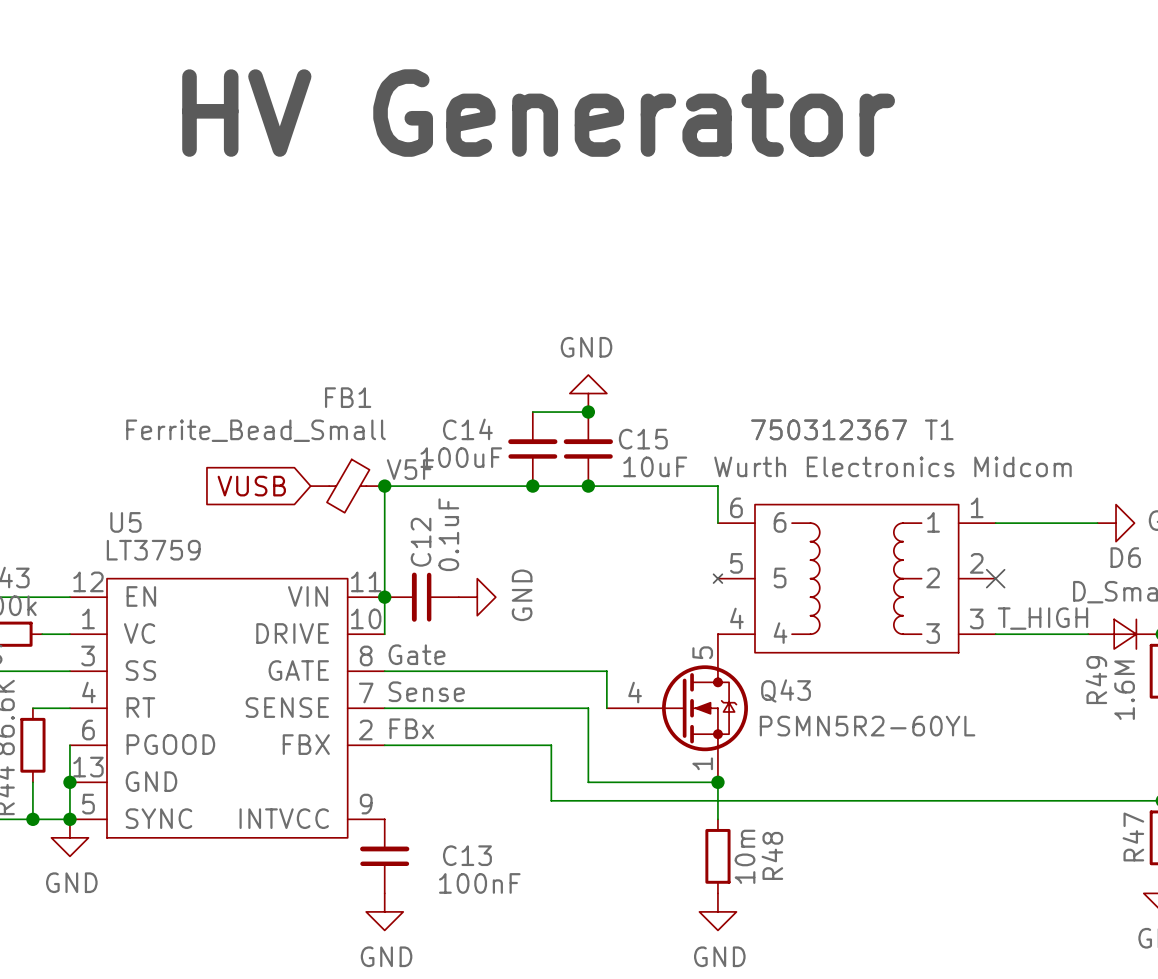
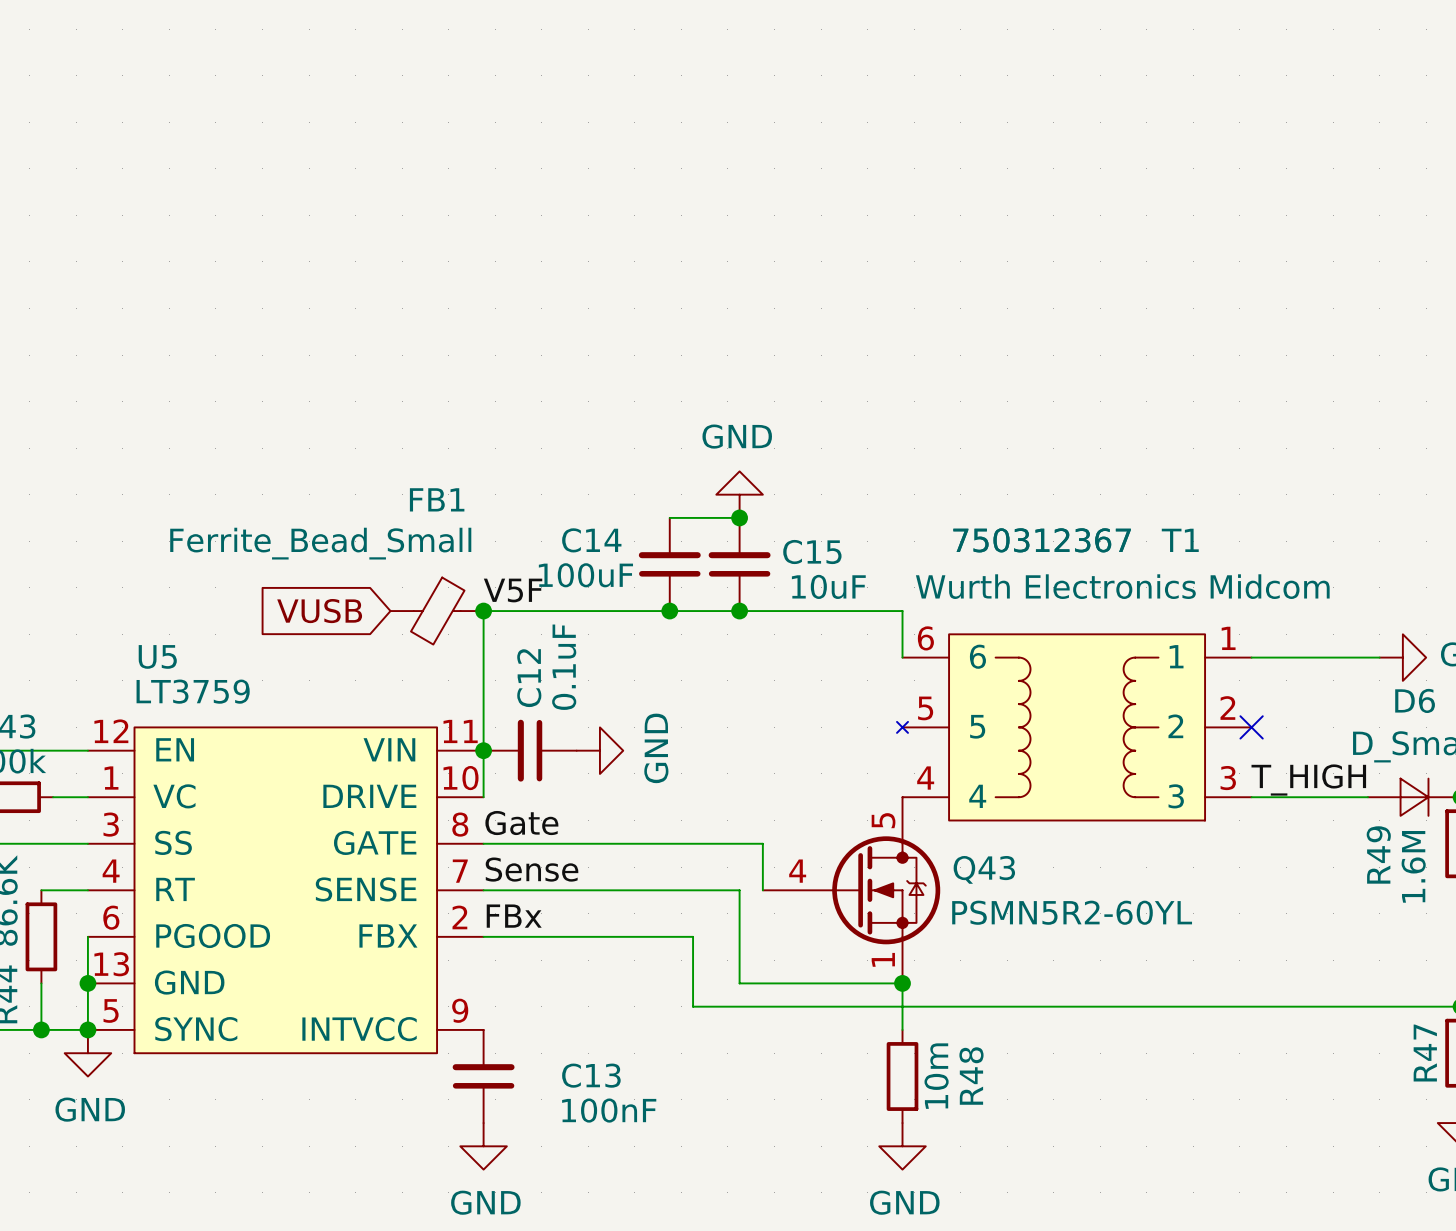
text: HV Generator (538, 113) -> none

